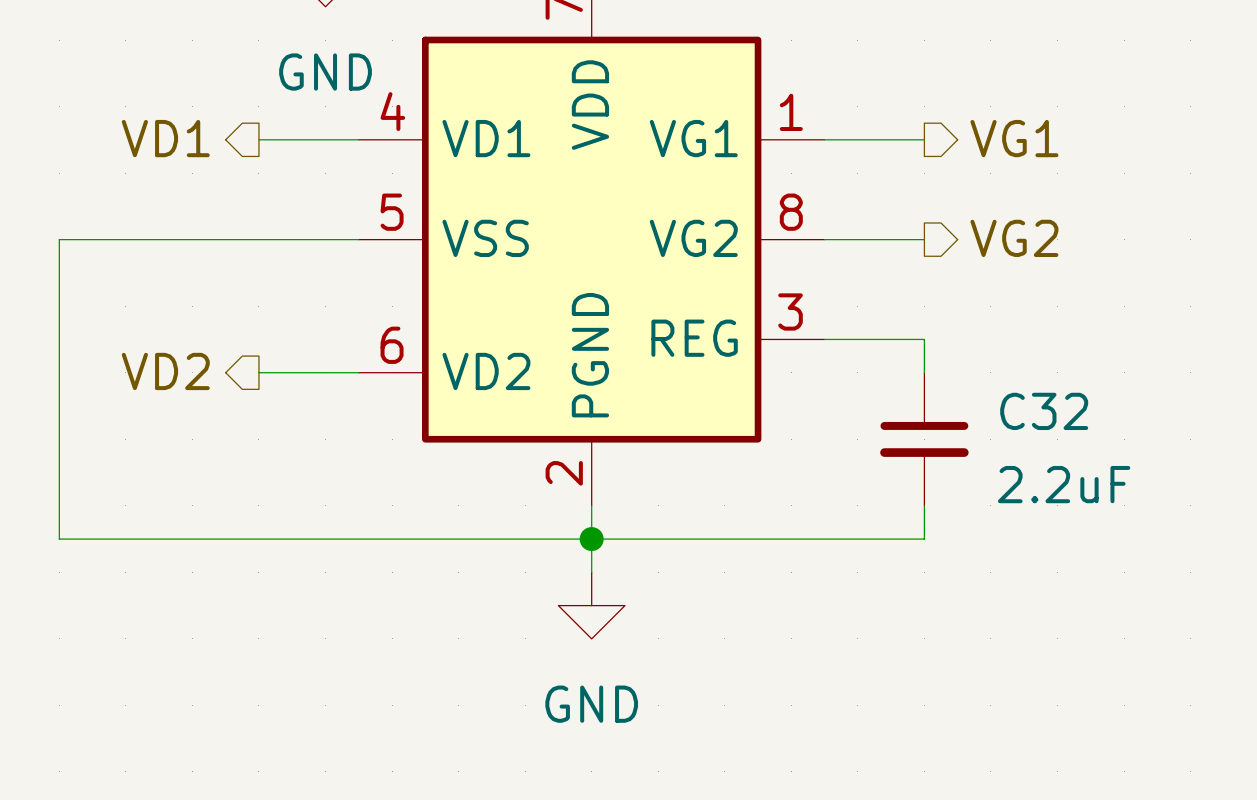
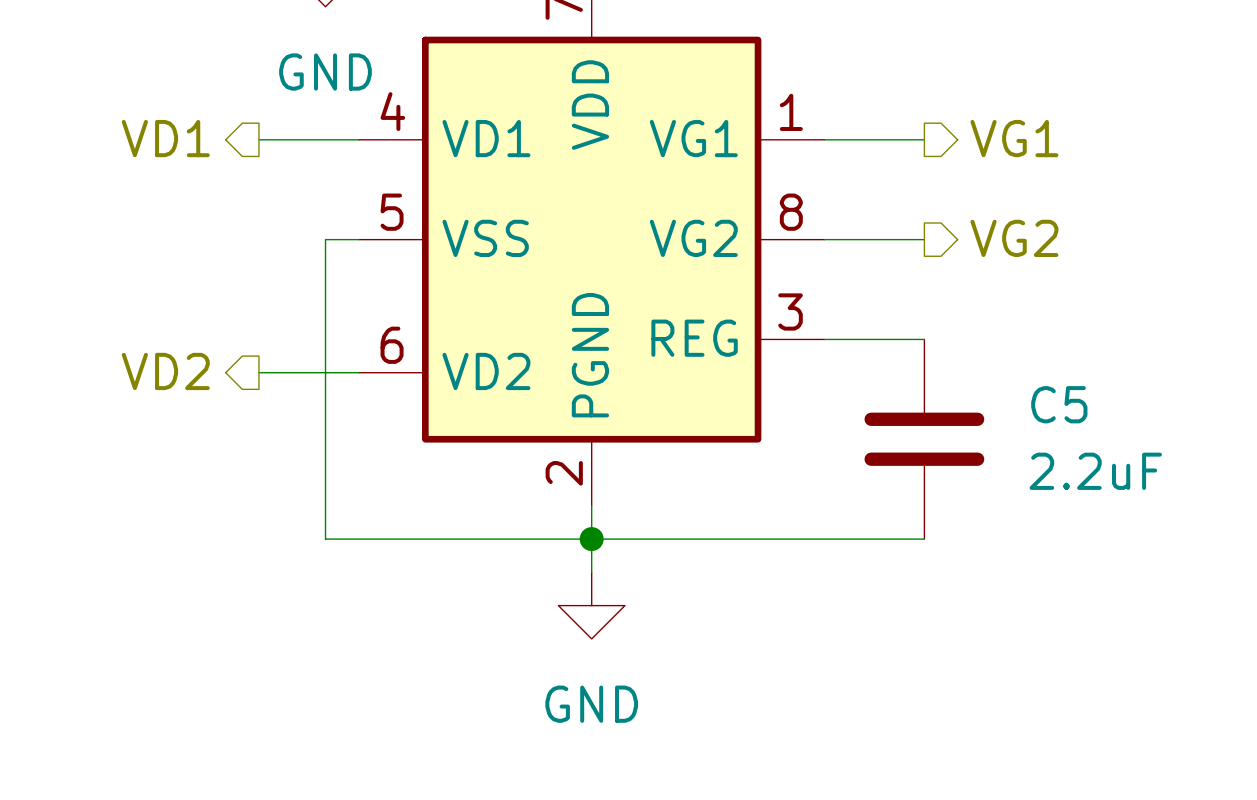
wire: (325, 239) (59, 239) (59, 539) (325, 539) -> (325, 239) (325, 539)
C32: 2.2uF (924, 439) -> none
C5: none -> 2.2uF (924, 439)

